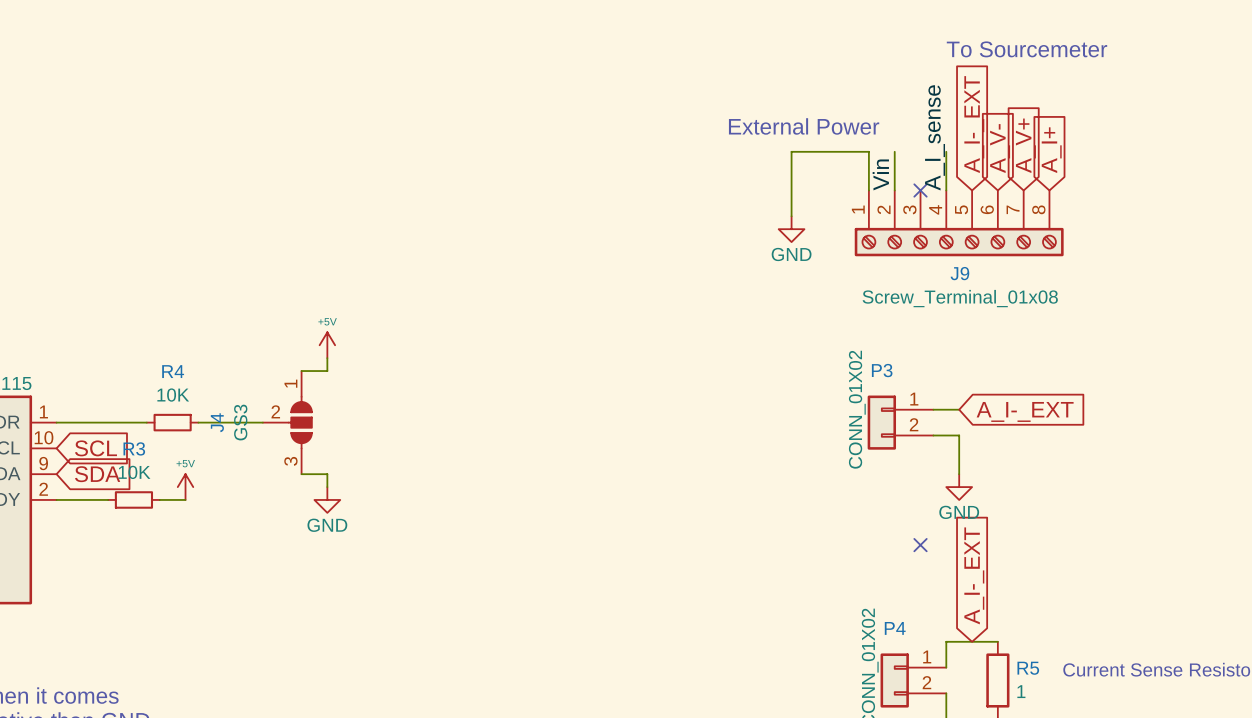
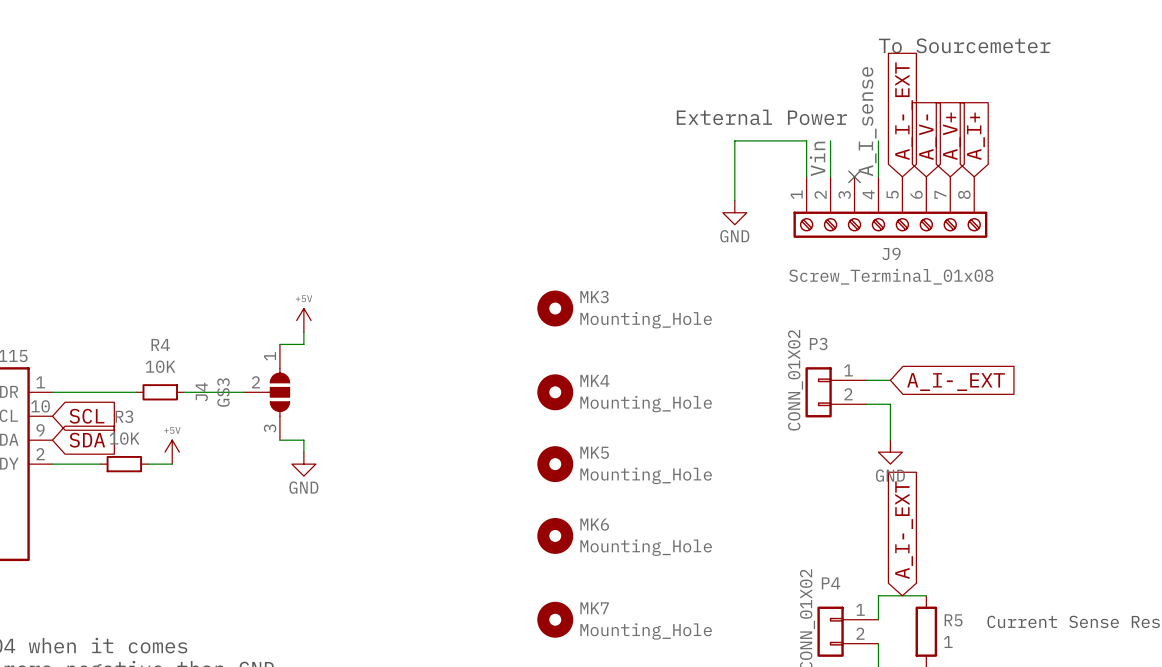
MK3: none -> Mounting_Hole (555, 308)
MK4: none -> Mounting_Hole (555, 392)
MK5: none -> Mounting_Hole (555, 464)
no-connect mark: (920, 545) -> none
MK6: none -> Mounting_Hole (555, 535)
MK7: none -> Mounting_Hole (555, 619)

